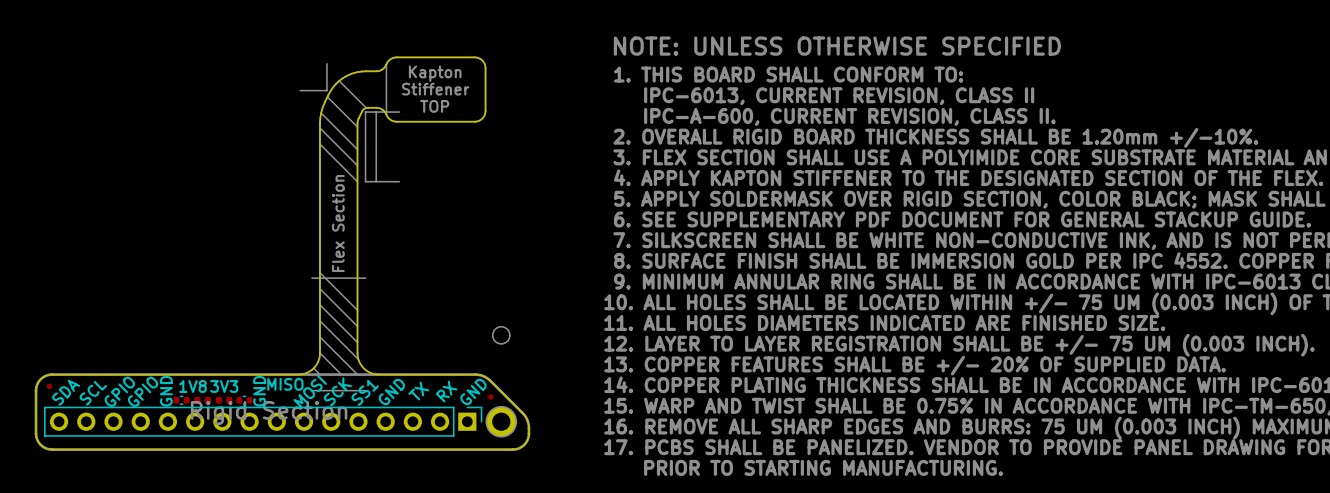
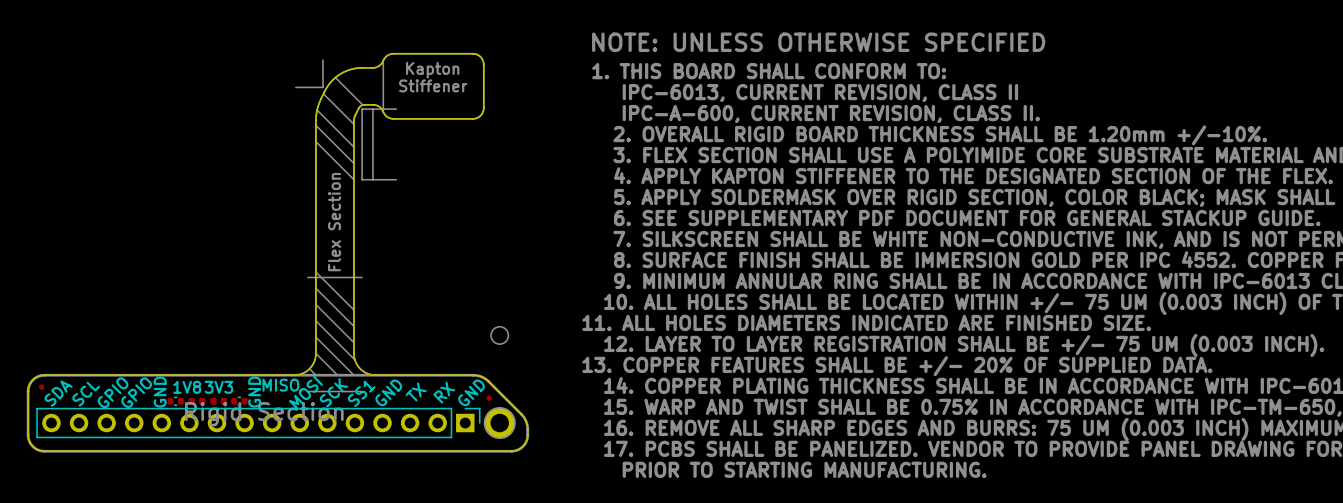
text position: NOTE: UNLESS OTHERWISE SPECIFIED (837, 46) -> NOTE: UNLESS OTHERWISE SPECIFIED (818, 42)
text position: 1. THIS BOARD SHALL CONFORM TO: (788, 74) -> 1. THIS BOARD SHALL CONFORM TO: (769, 71)
text position: IPC-6013, CURRENT REVISION, CLASS II (839, 96) -> IPC-6013, CURRENT REVISION, CLASS II (820, 93)
text: TOP (434, 106) -> none
text position: IPC-A-600, CURRENT REVISION, CLASS II. (849, 116) -> IPC-A-600, CURRENT REVISION, CLASS II. (831, 114)
text position: 11. ALL HOLES DIAMETERS INDICATED ARE FINISHED SIZE. (884, 322) -> 11. ALL HOLES DIAMETERS INDICATED ARE FINISHED SIZE. (866, 322)
text position: 13. COPPER FEATURES SHALL BE +/- 20% OF SUPPLIED DATA. (915, 365) -> 13. COPPER FEATURES SHALL BE +/- 20% OF SUPPLIED DATA. (897, 366)
text position: PRIOR TO STARTING MANUFACTURING. (823, 467) -> PRIOR TO STARTING MANUFACTURING. (804, 469)

